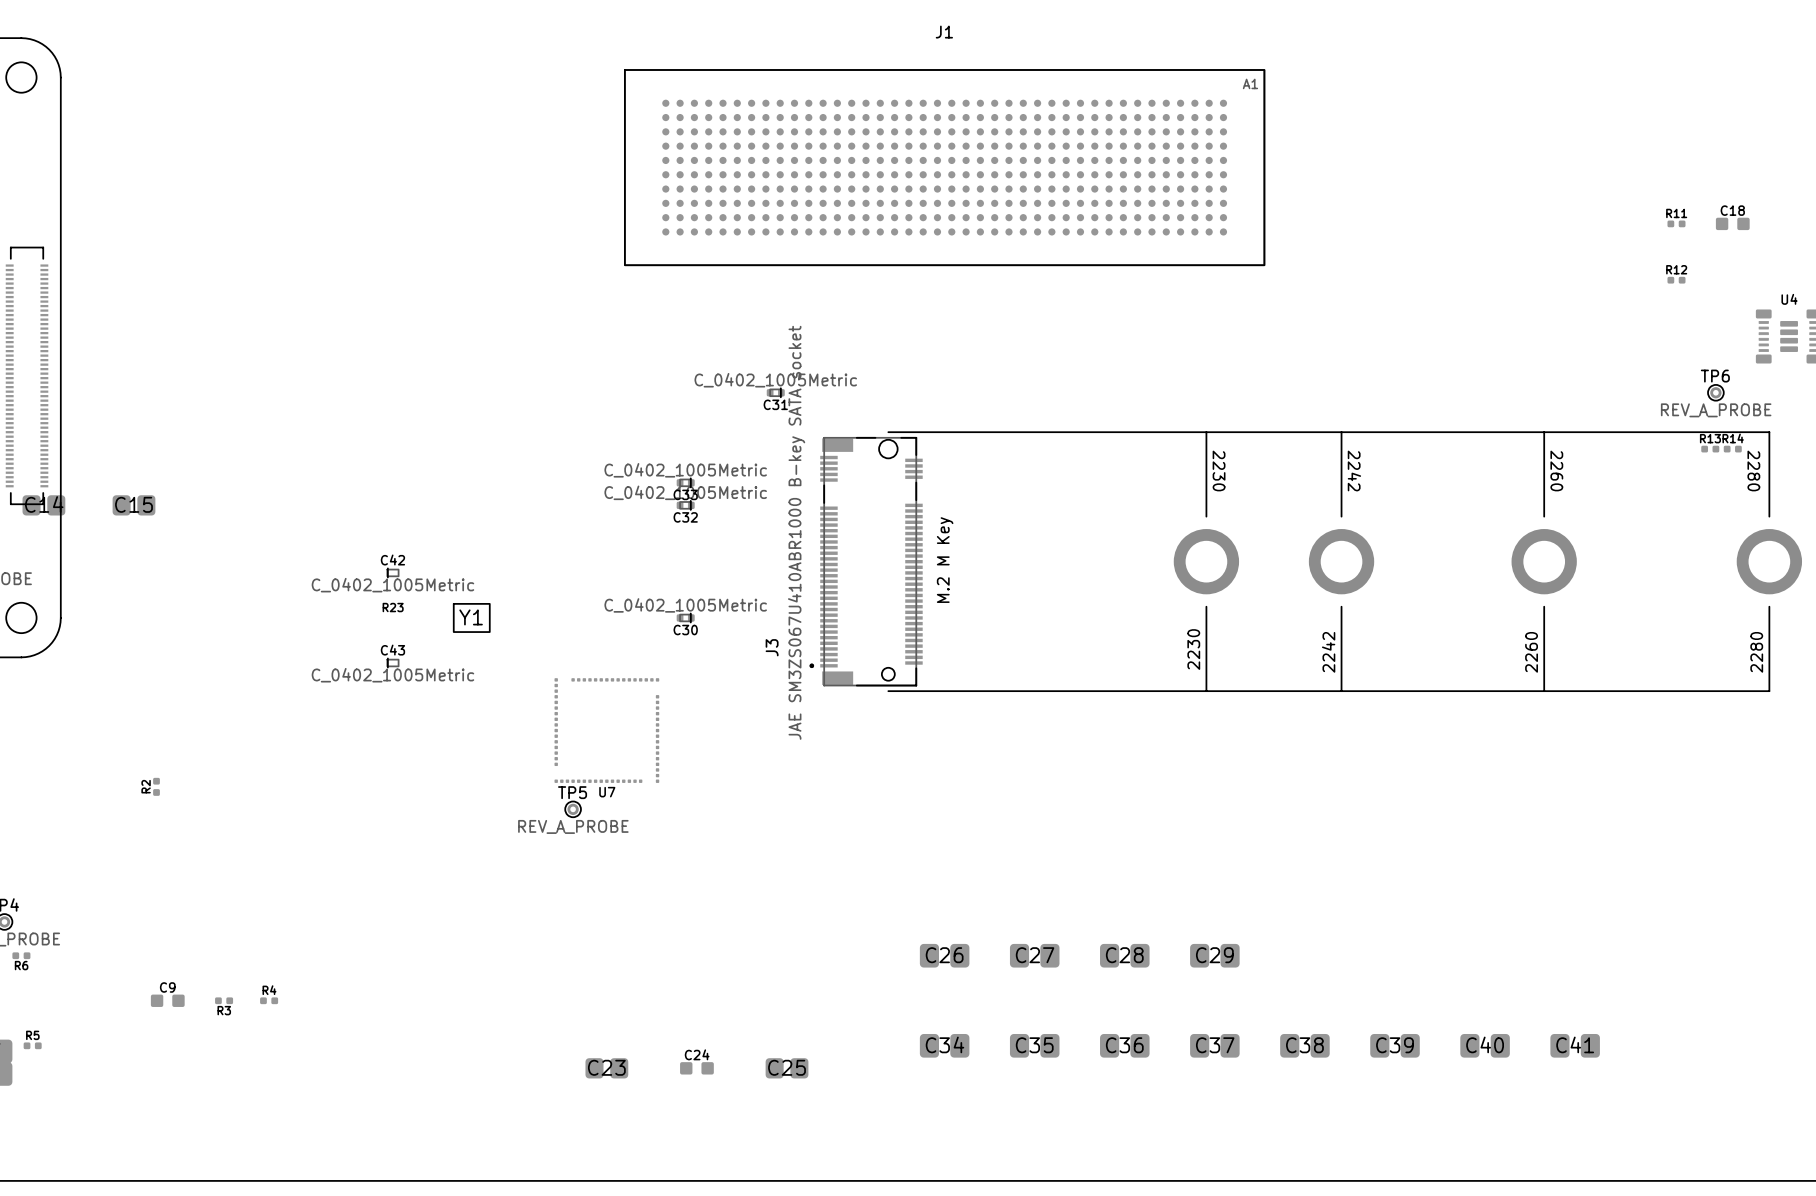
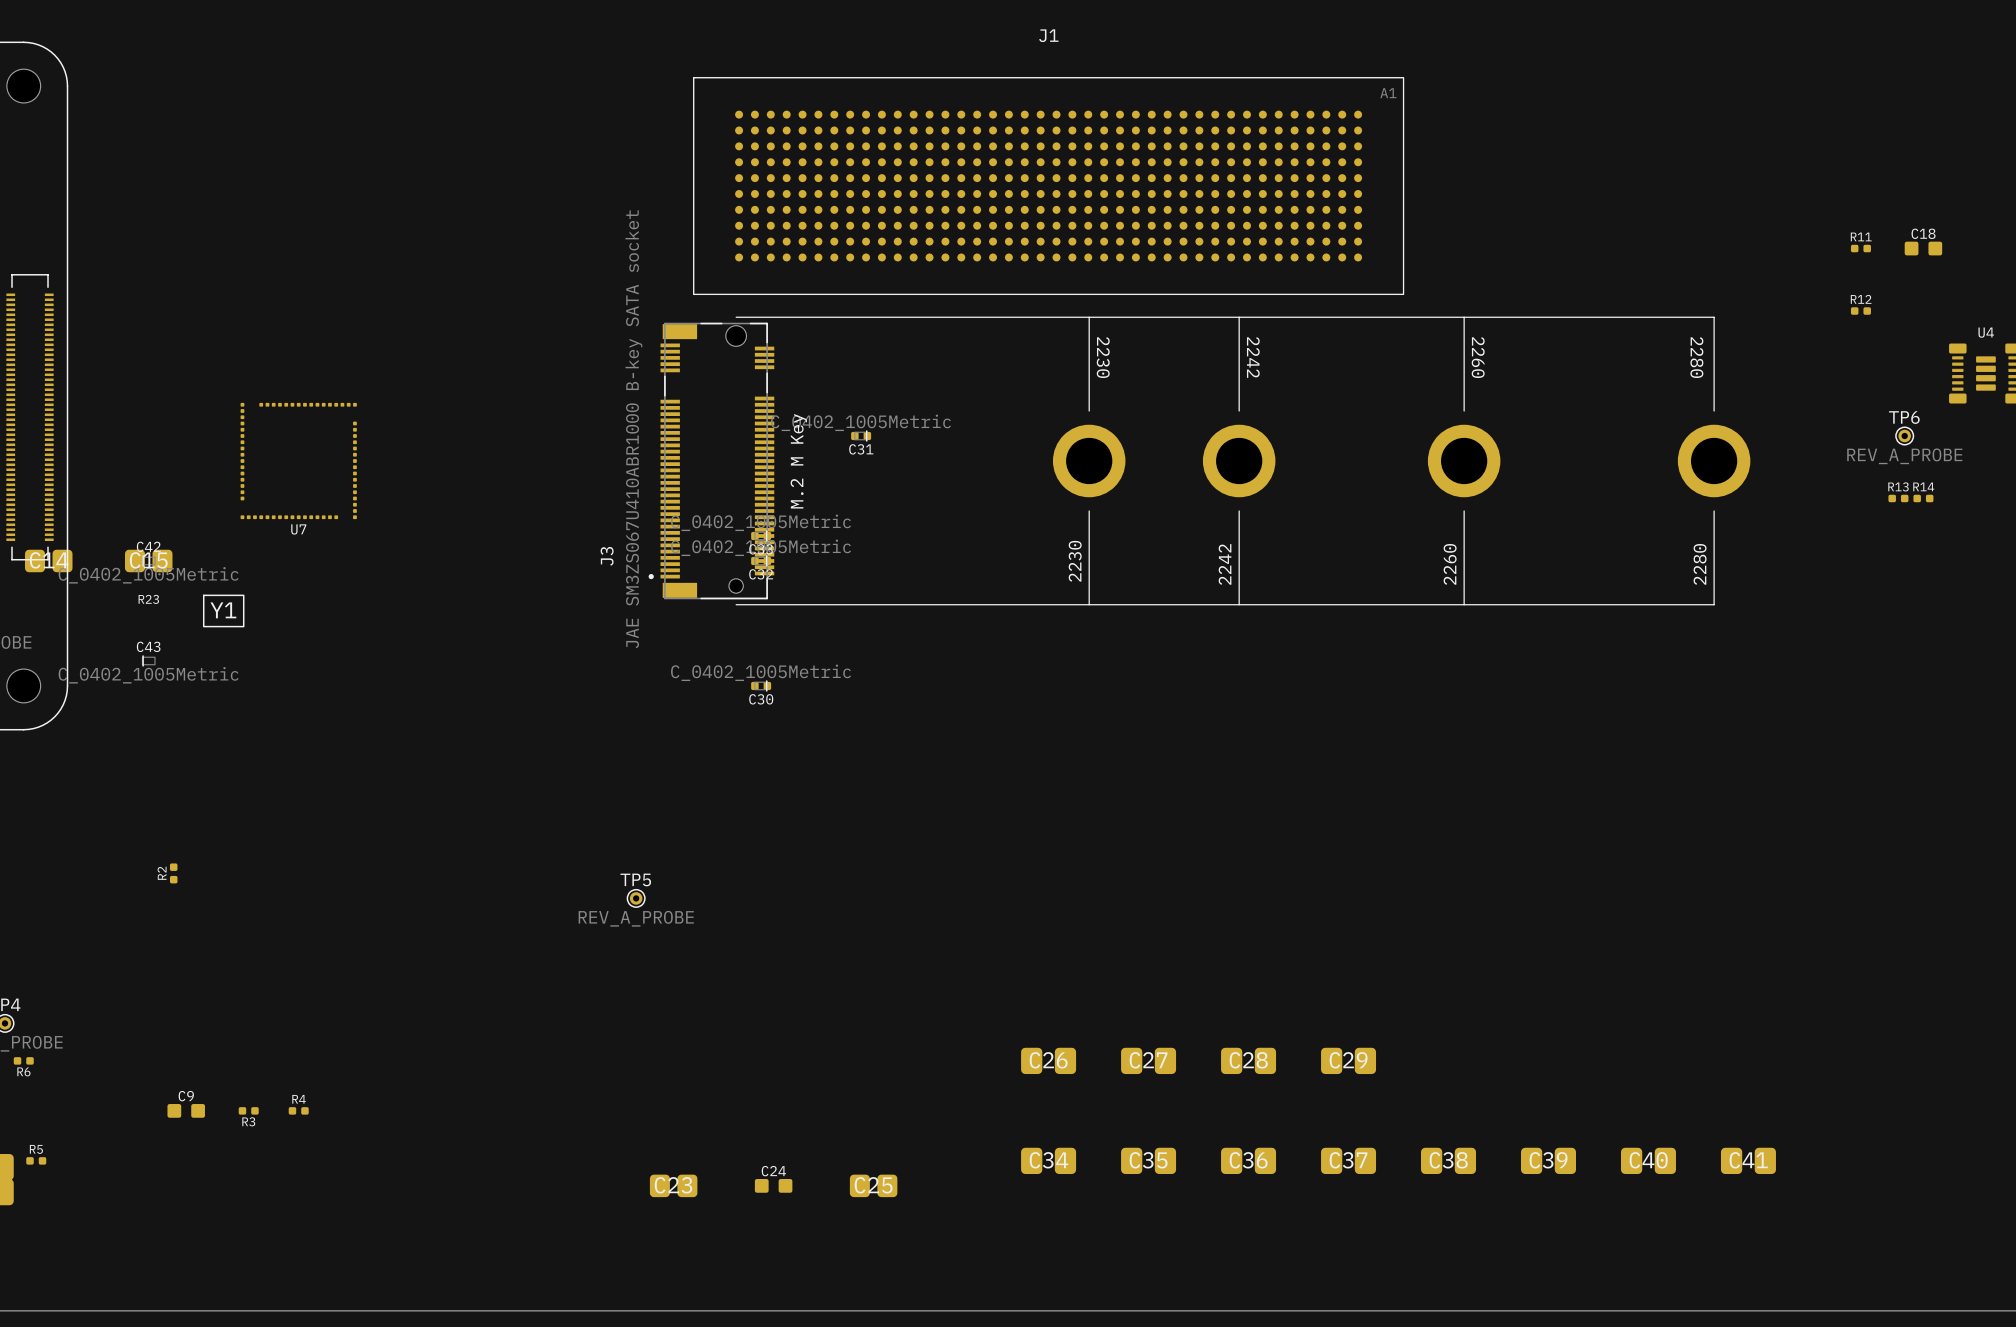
J3 position: (1305, 561) -> (1199, 461)
C42 position: (392, 572) -> (148, 560)
R23 position: (393, 607) -> (148, 599)
Y1 position: (471, 617) -> (223, 610)
C43 position: (392, 663) -> (148, 660)
U7 position: (606, 730) -> (298, 461)

